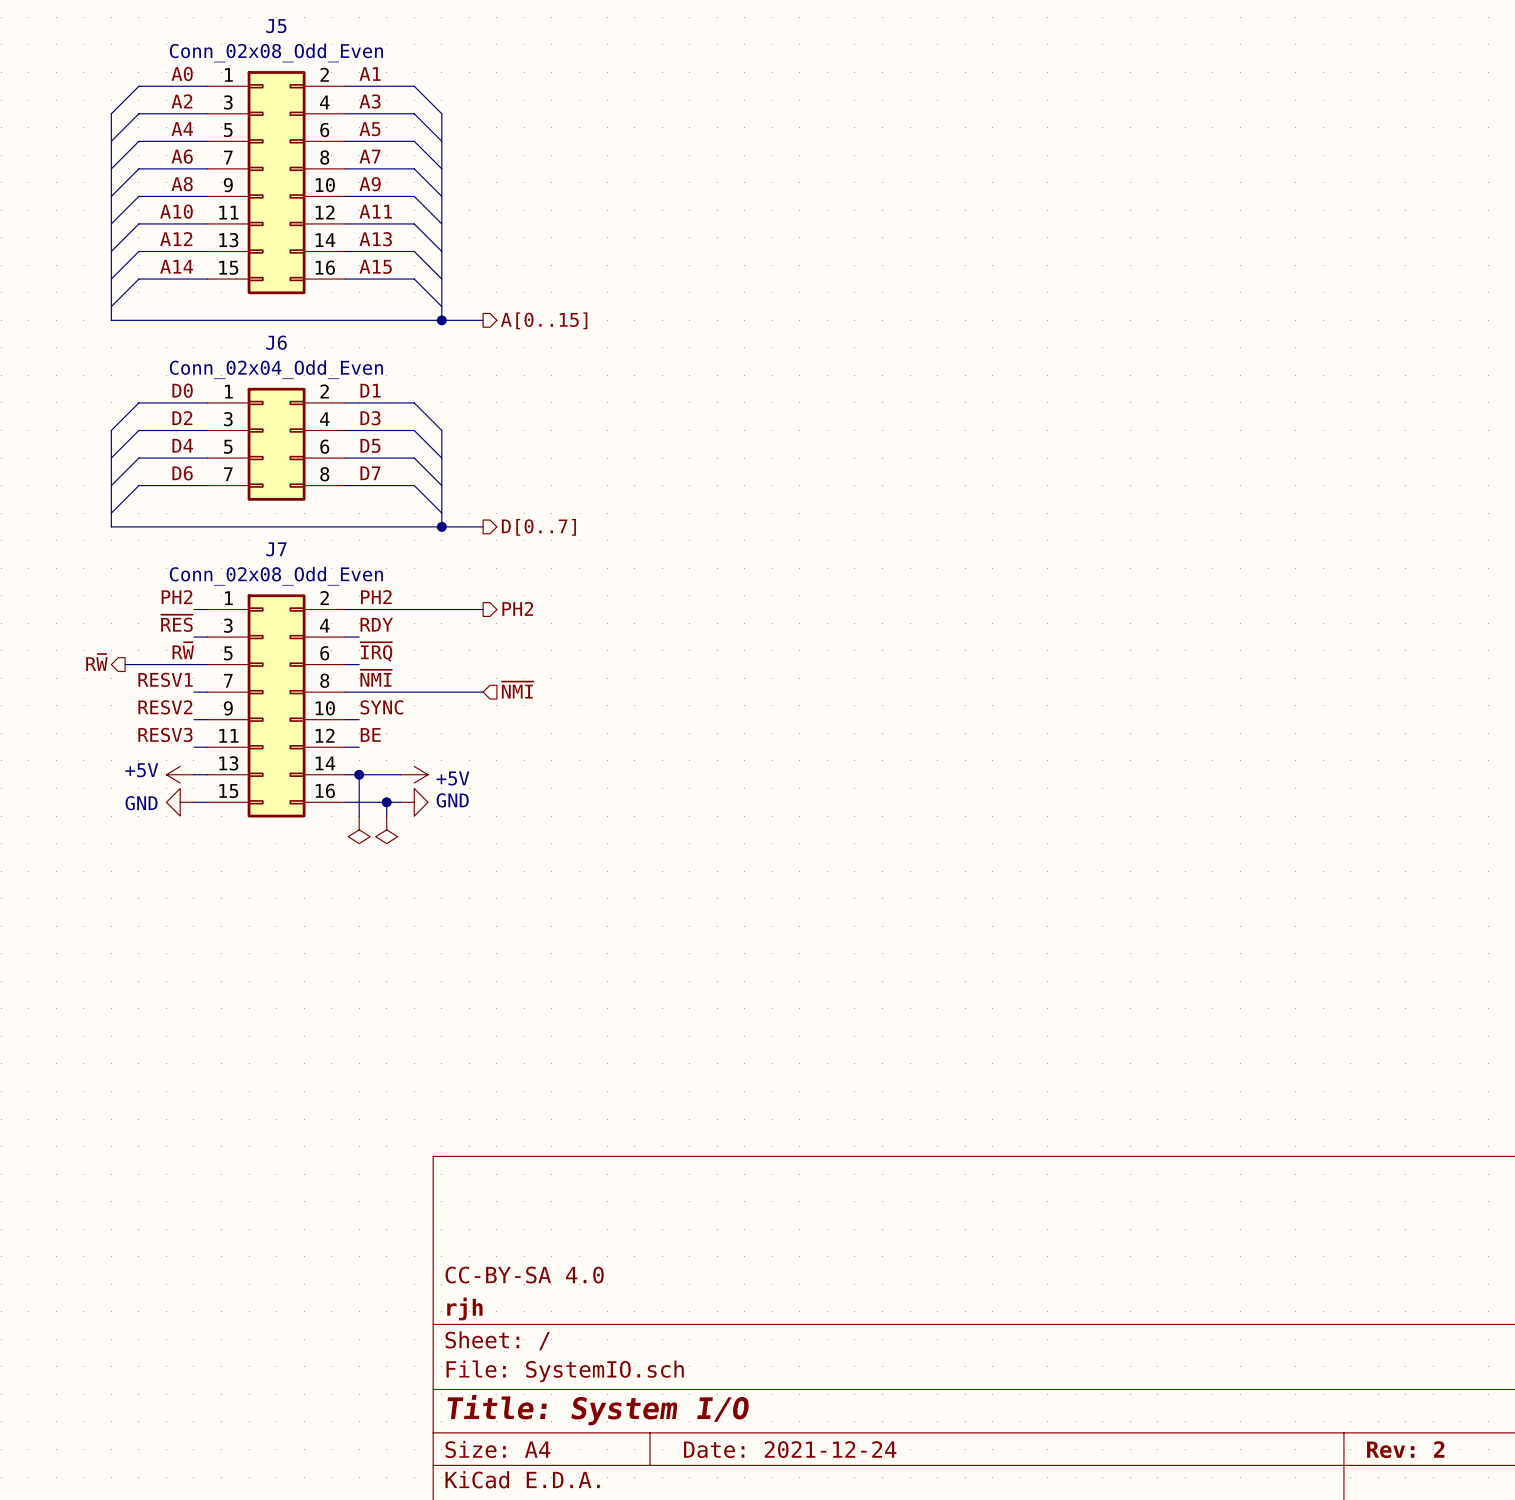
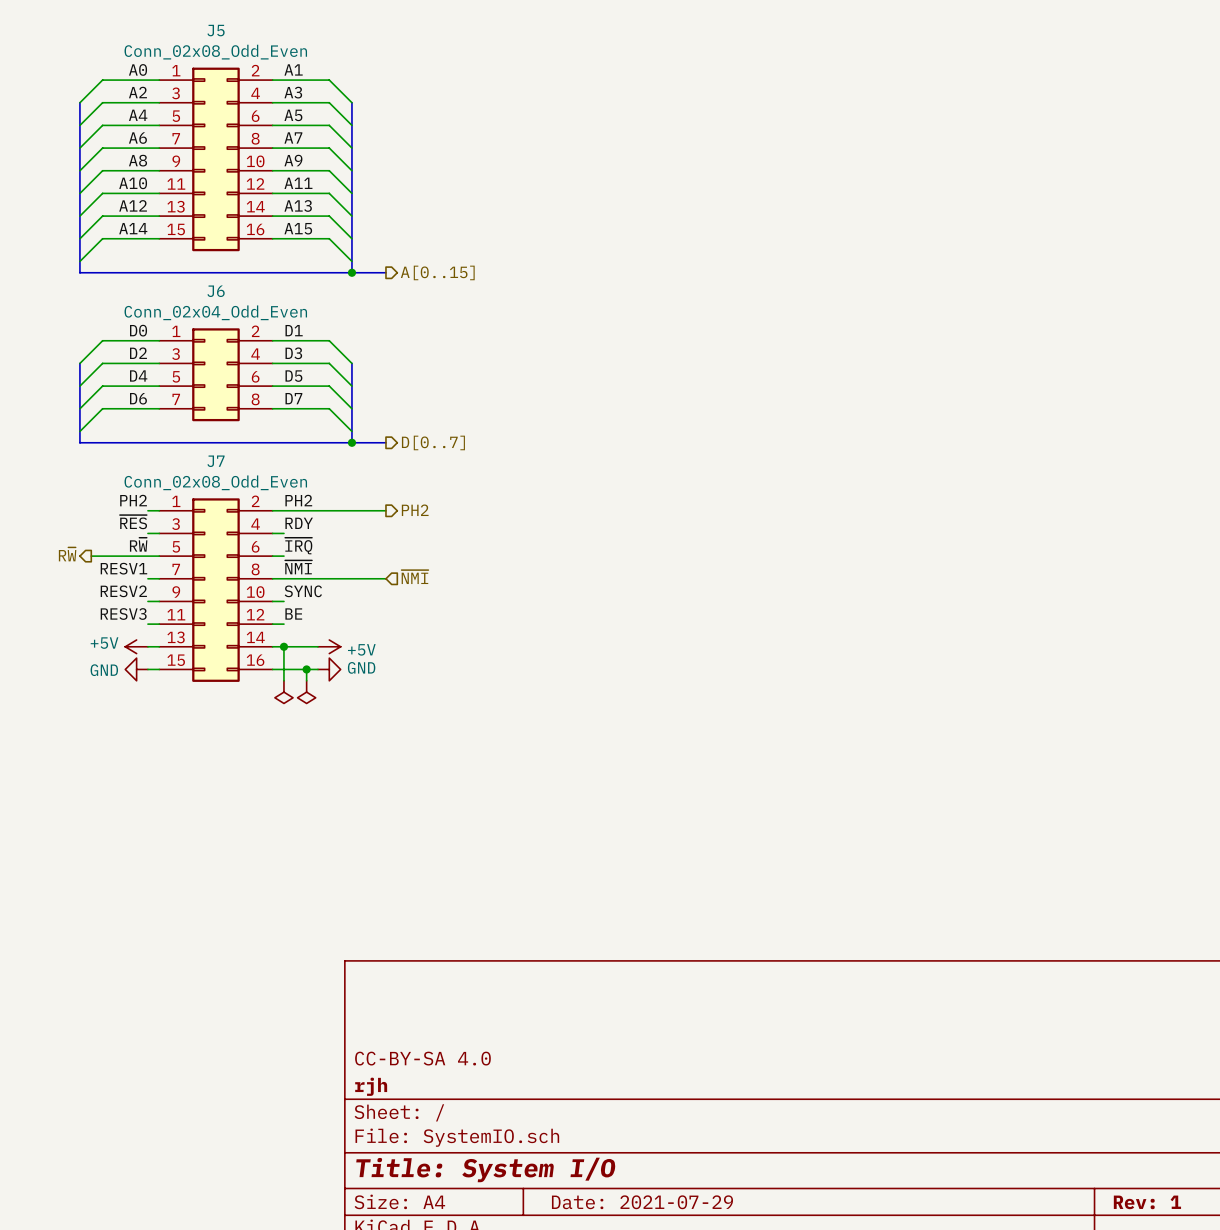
title block: Date: 2021-12-24 (790, 1449) -> Date: 2021-07-29 (642, 1202)
title block: Rev: 2 (1405, 1449) -> Rev: 1 (1147, 1202)

